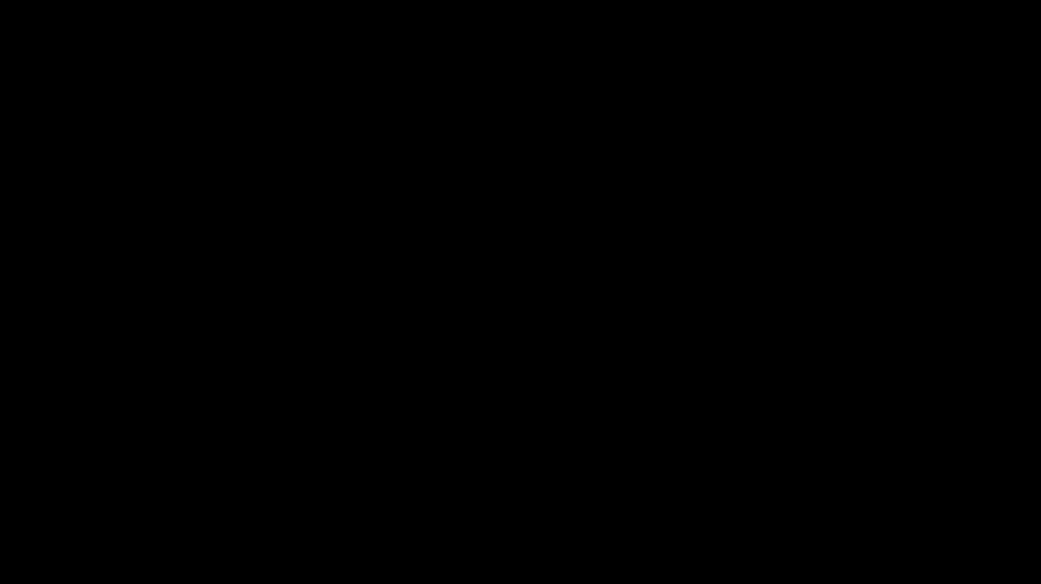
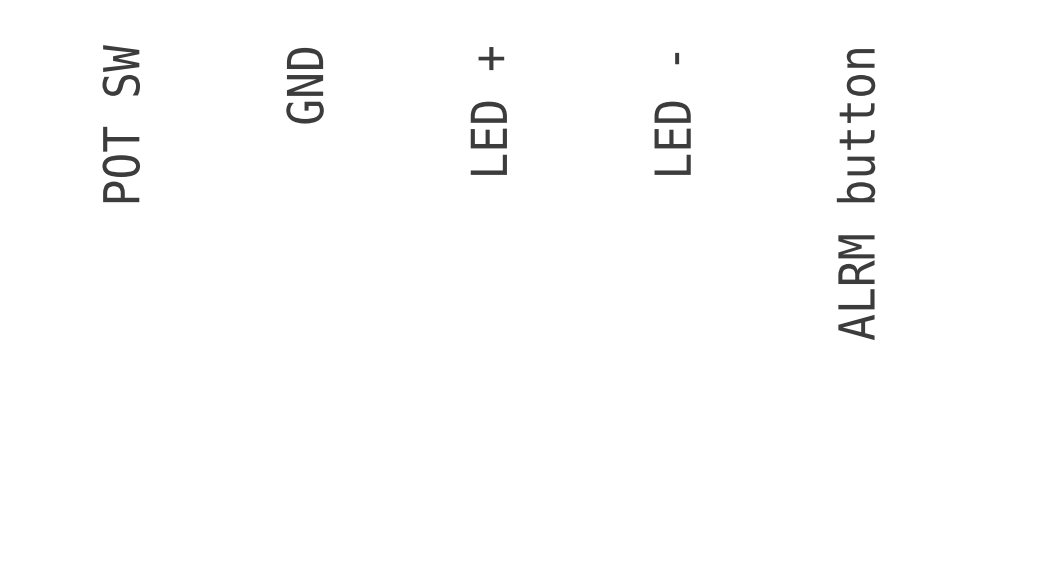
text: none -> GND (305, 85)
text: none -> LED + (488, 110)
text: none -> LED - (672, 113)
text: none -> POT SW (121, 123)
text: none -> ALRM button (856, 194)

